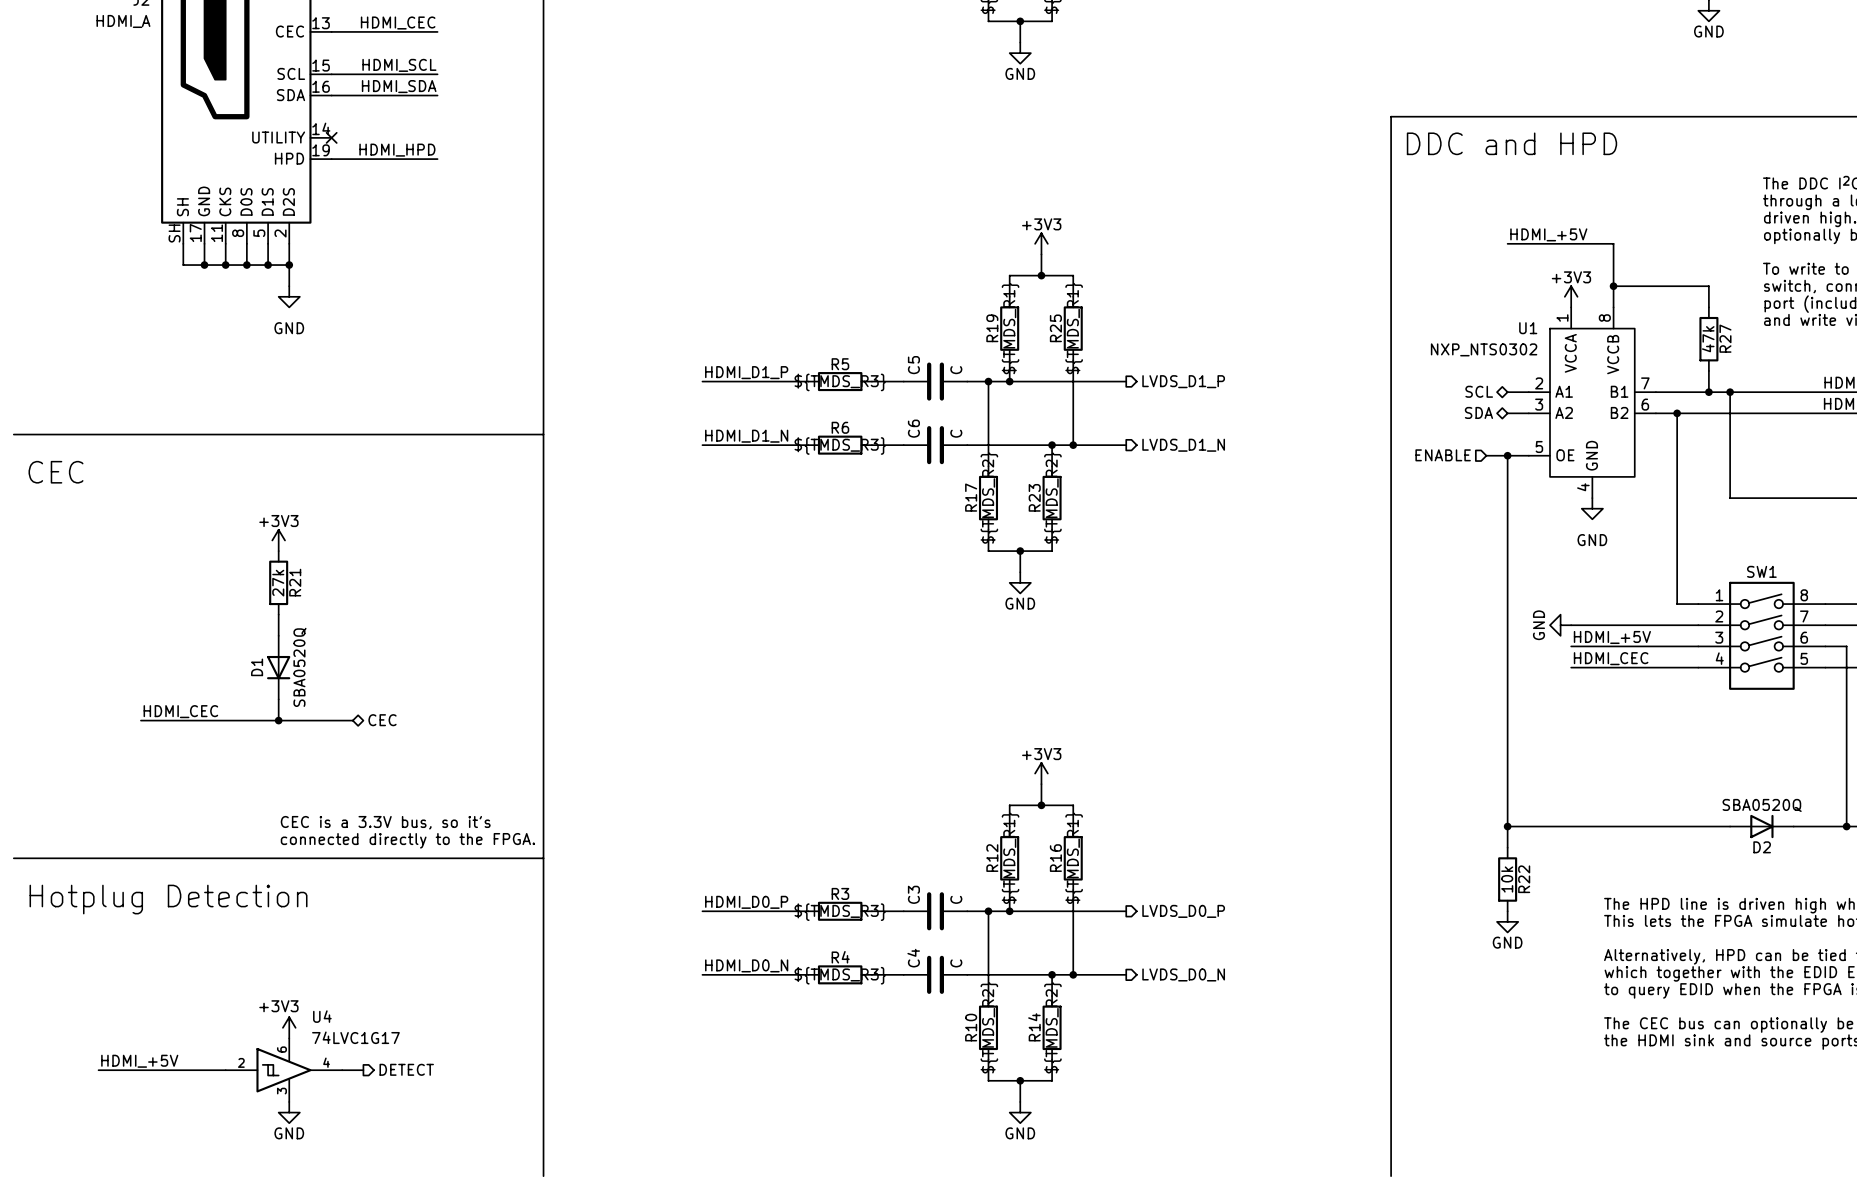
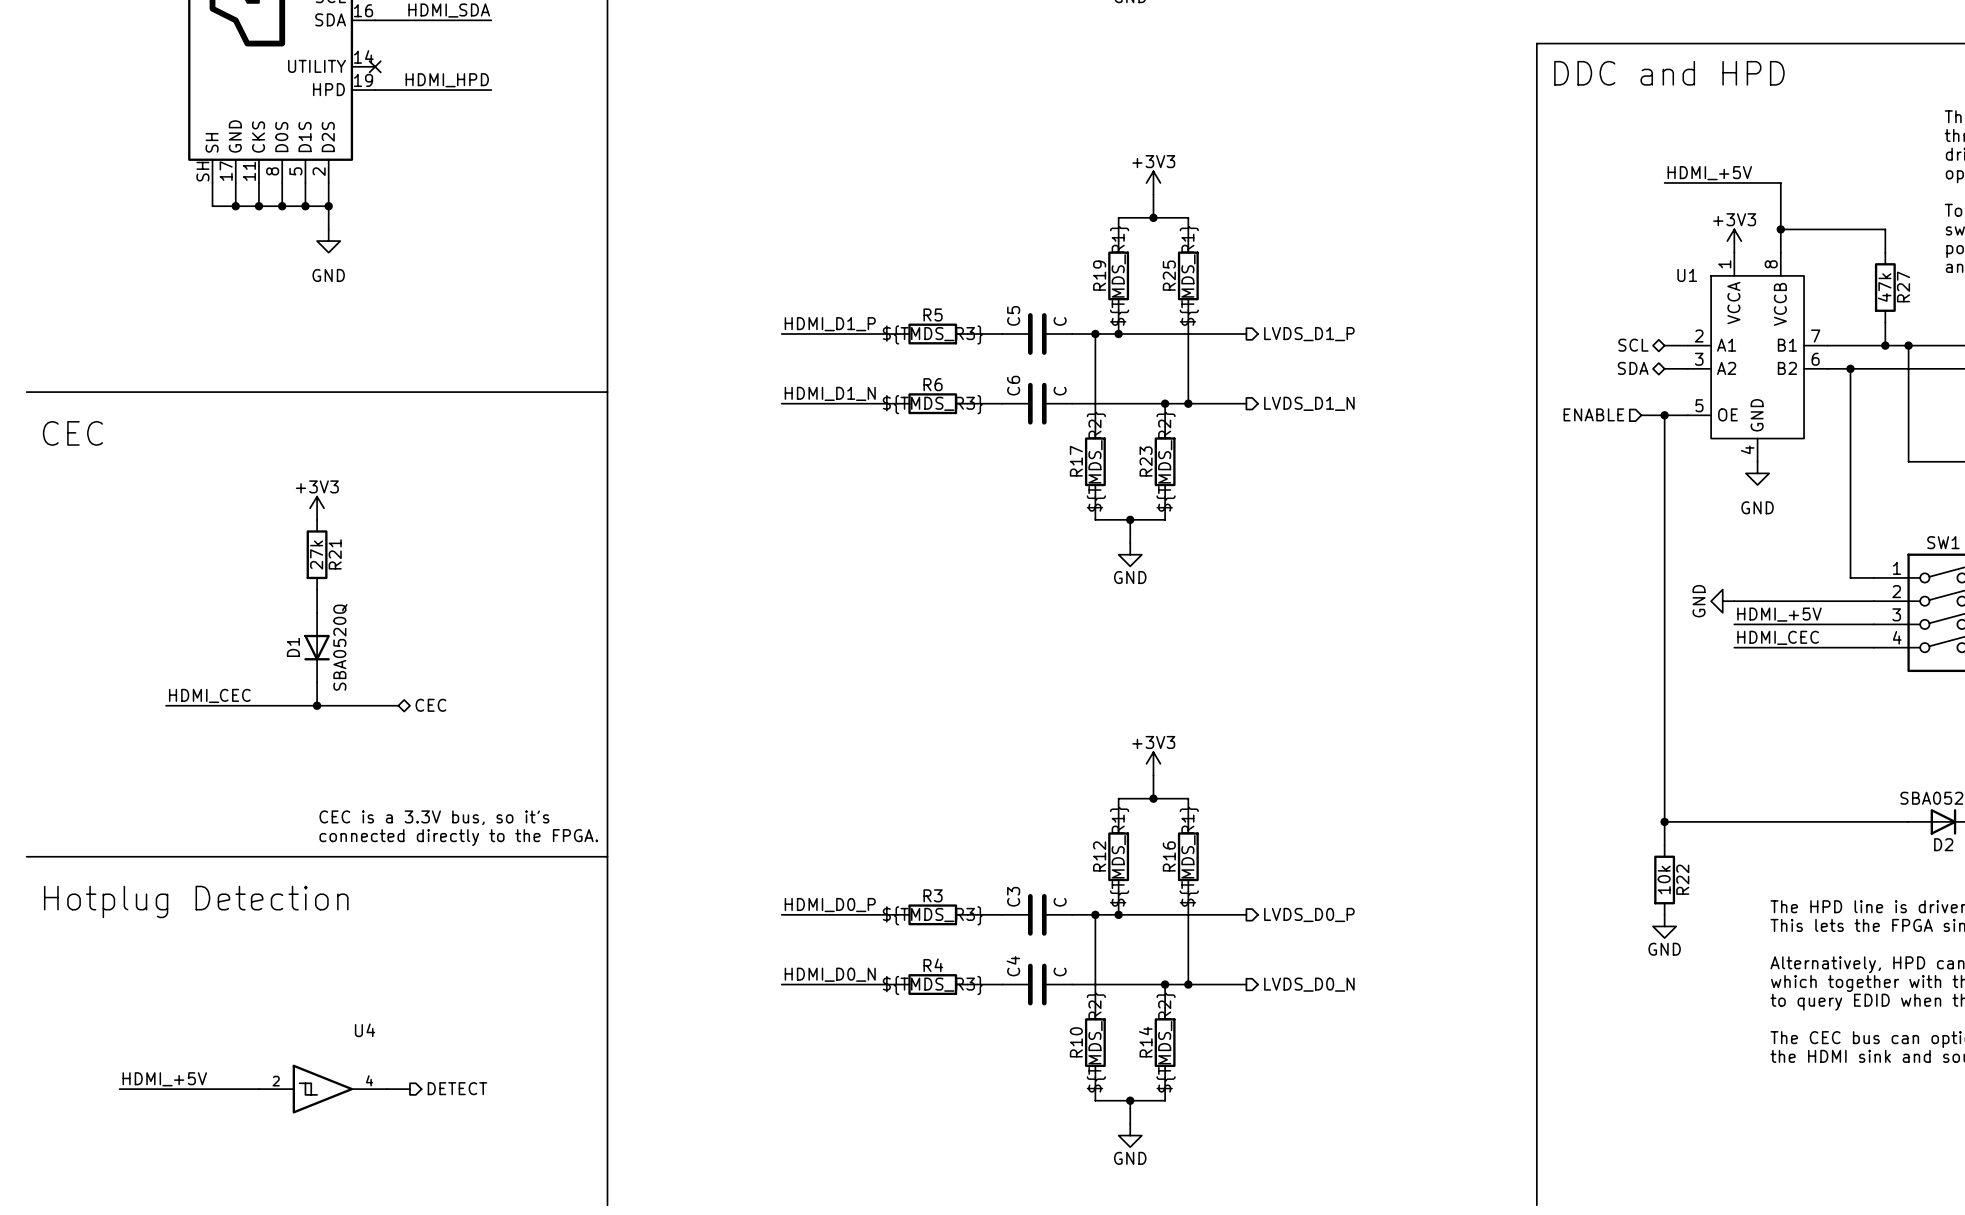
U1 value: NXP_NTS0302 (1484, 349) -> none
power symbol: +3V3 (289, 1027) -> none
U4 value: 74LVC1G17 (355, 1037) -> none
U4 symbol: [225, 1038, 343, 1102] -> [258, 1064, 387, 1114]
power symbol: GND (289, 1112) -> none

